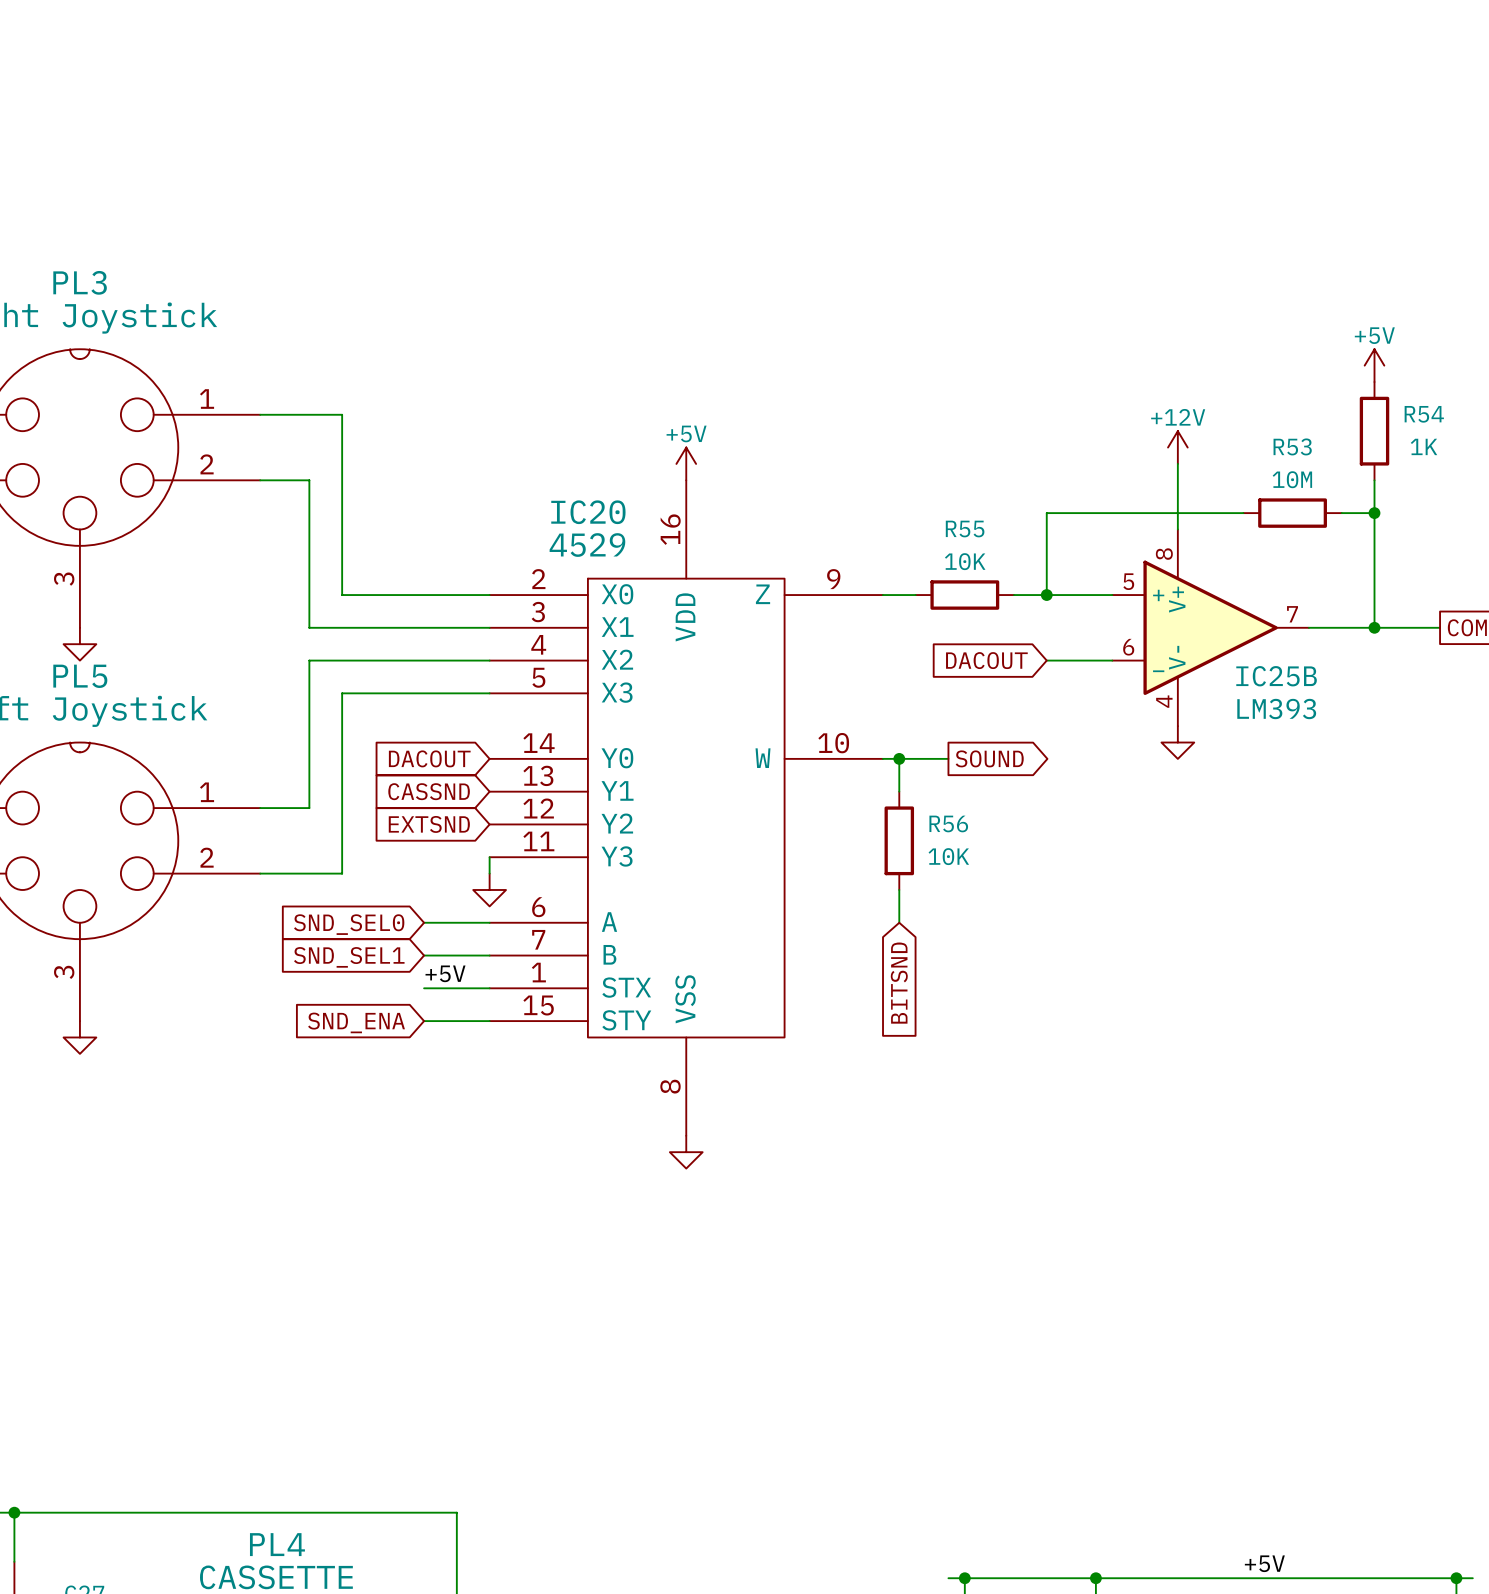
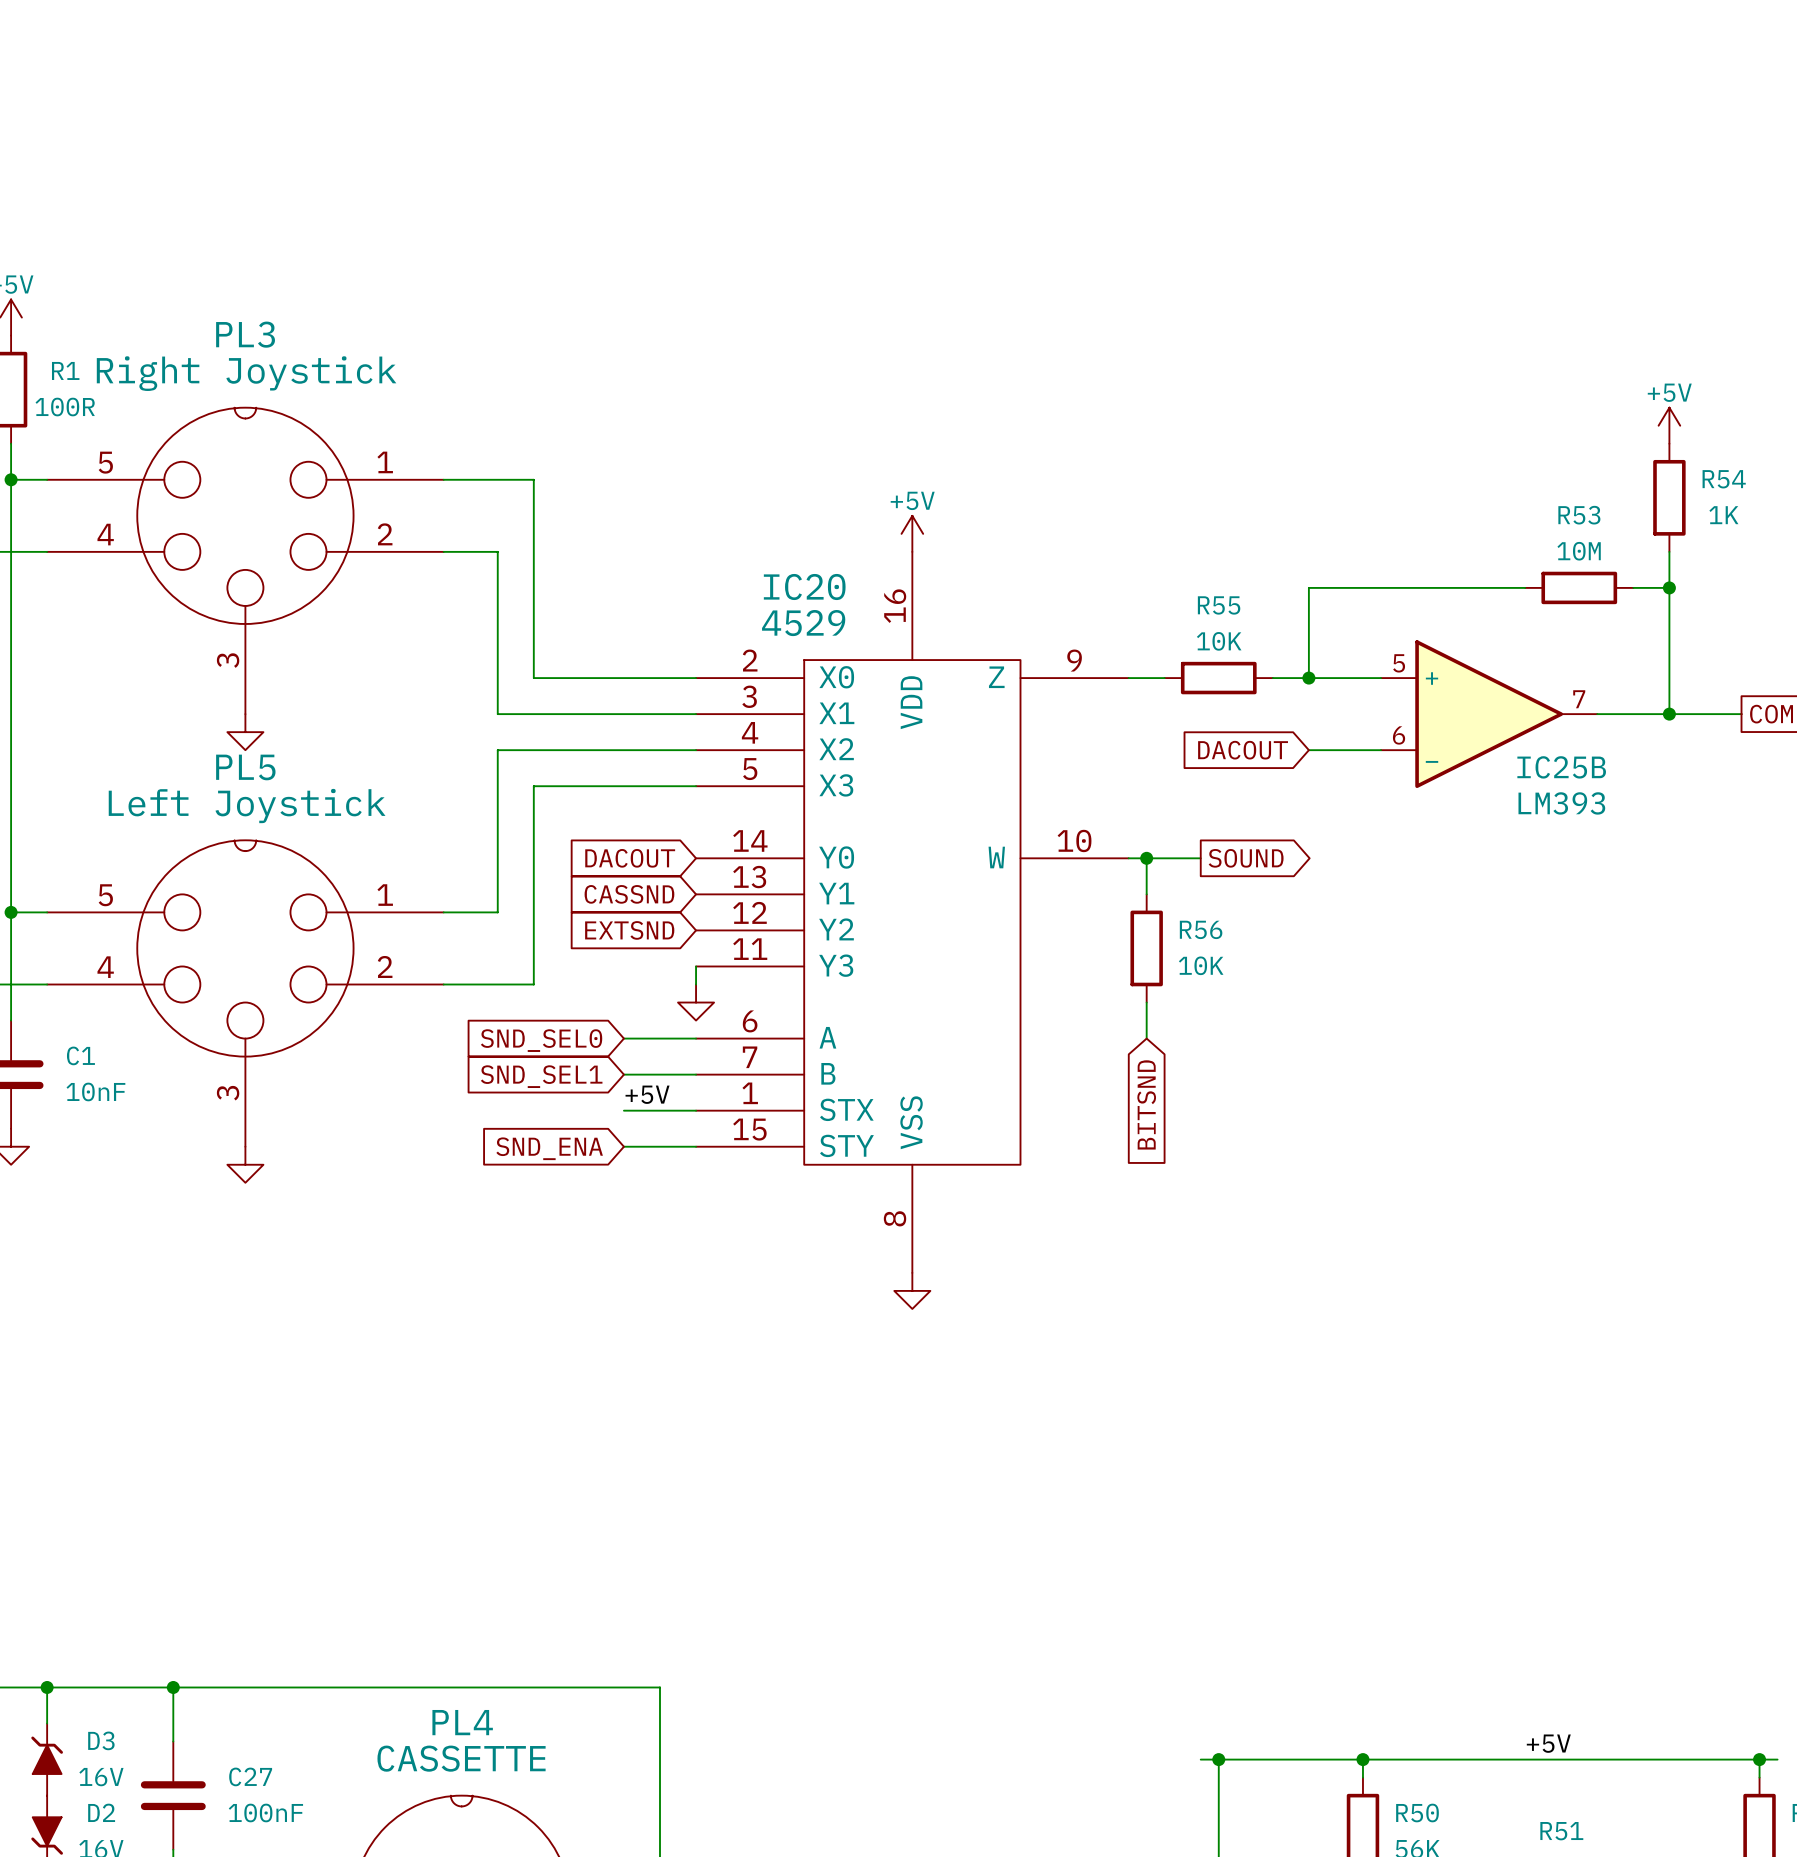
power symbol: +12V (1177, 447) -> none
wire: (1177, 463) (1177, 529) -> none
IC25B symbol: [1112, 529, 1309, 727] -> [1381, 640, 1598, 789]
power symbol: (1177, 742) -> none

